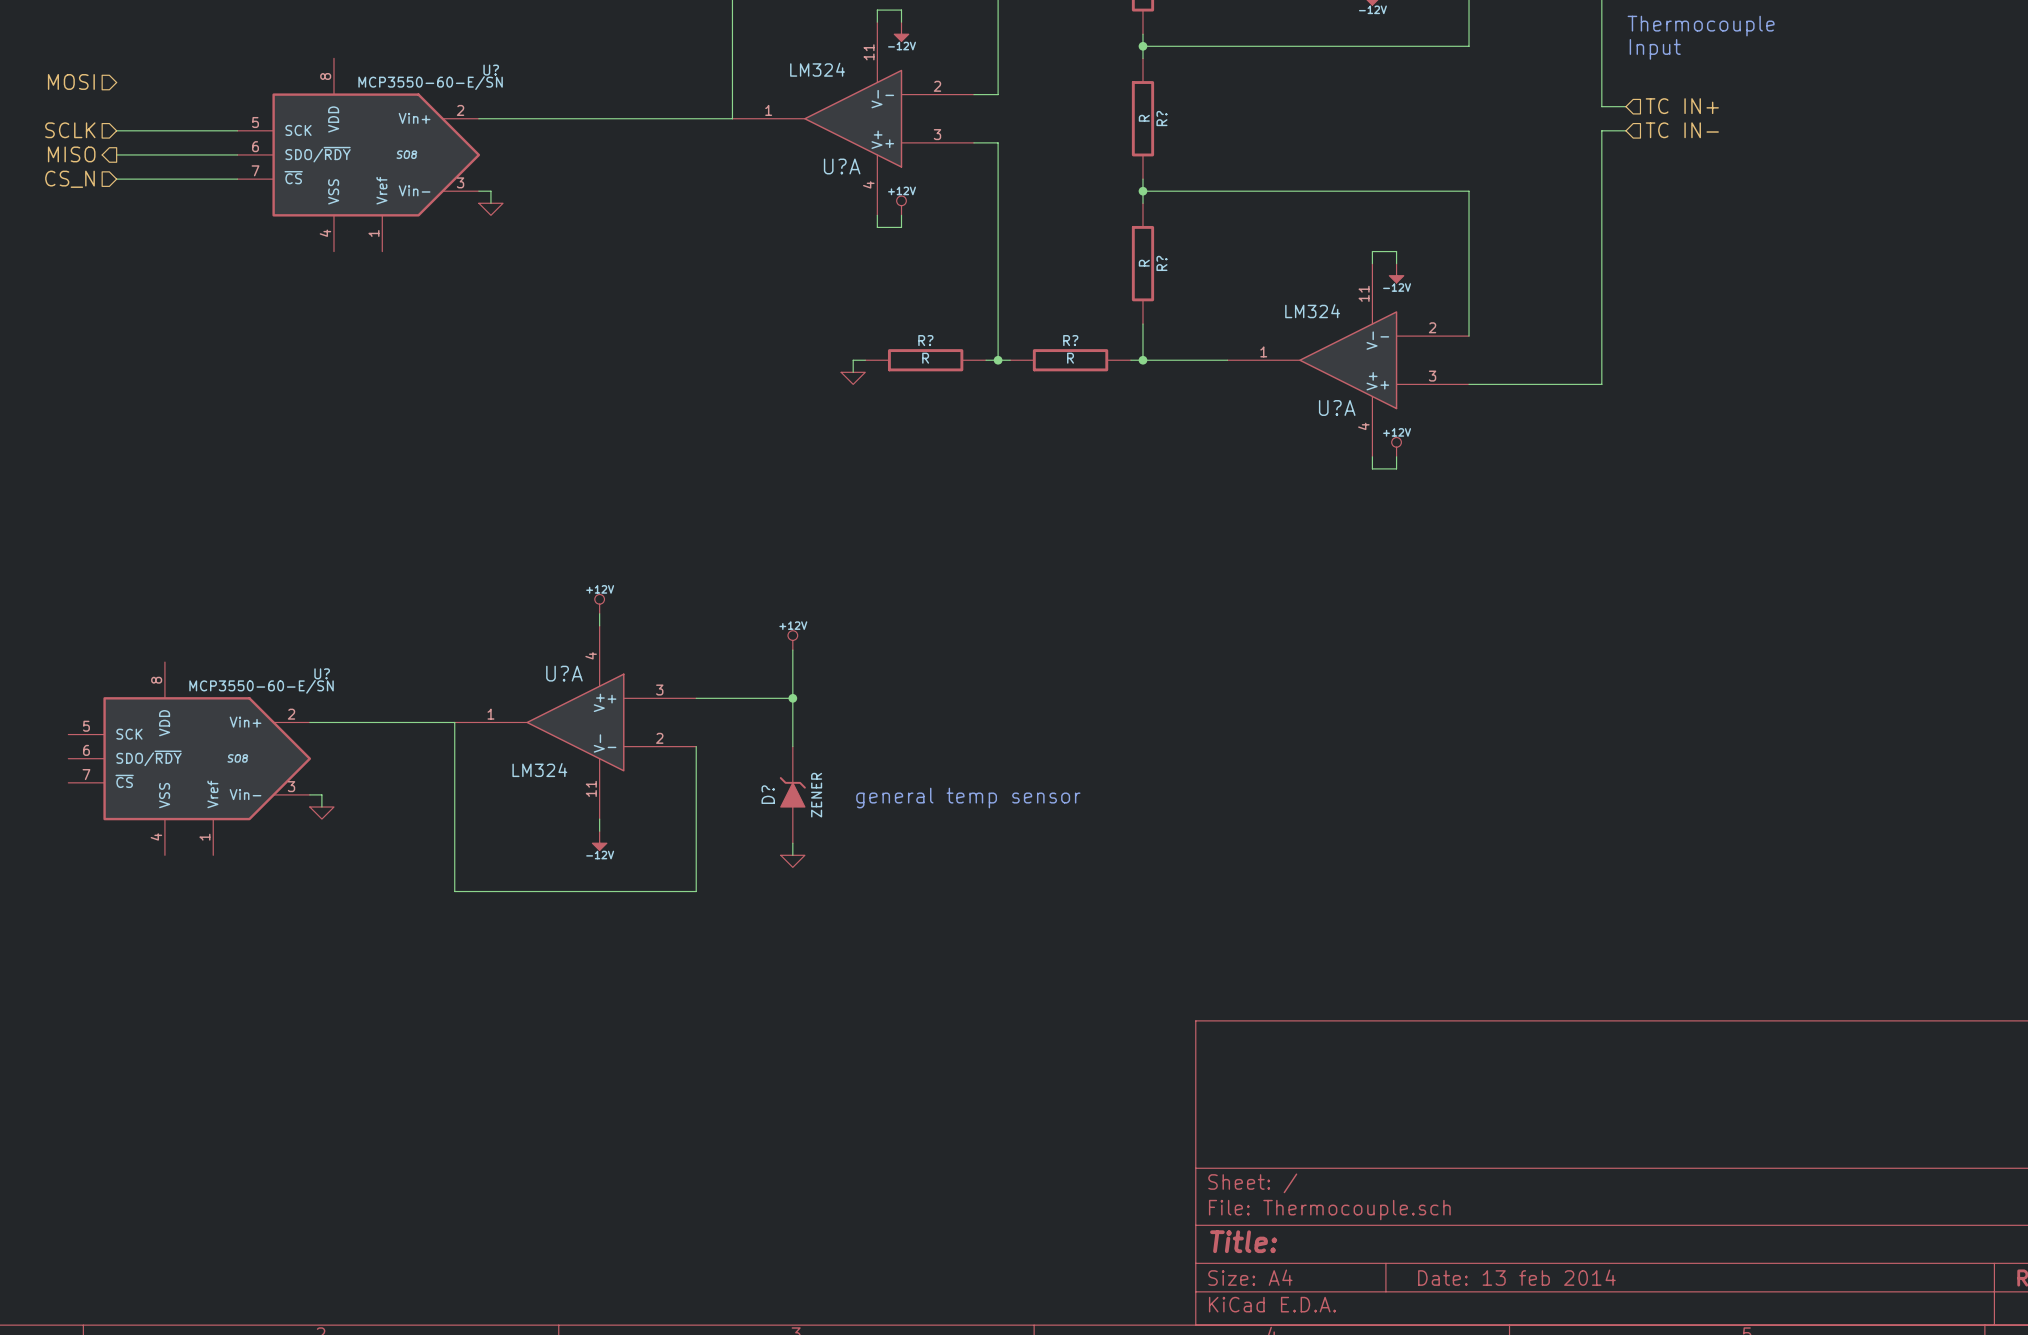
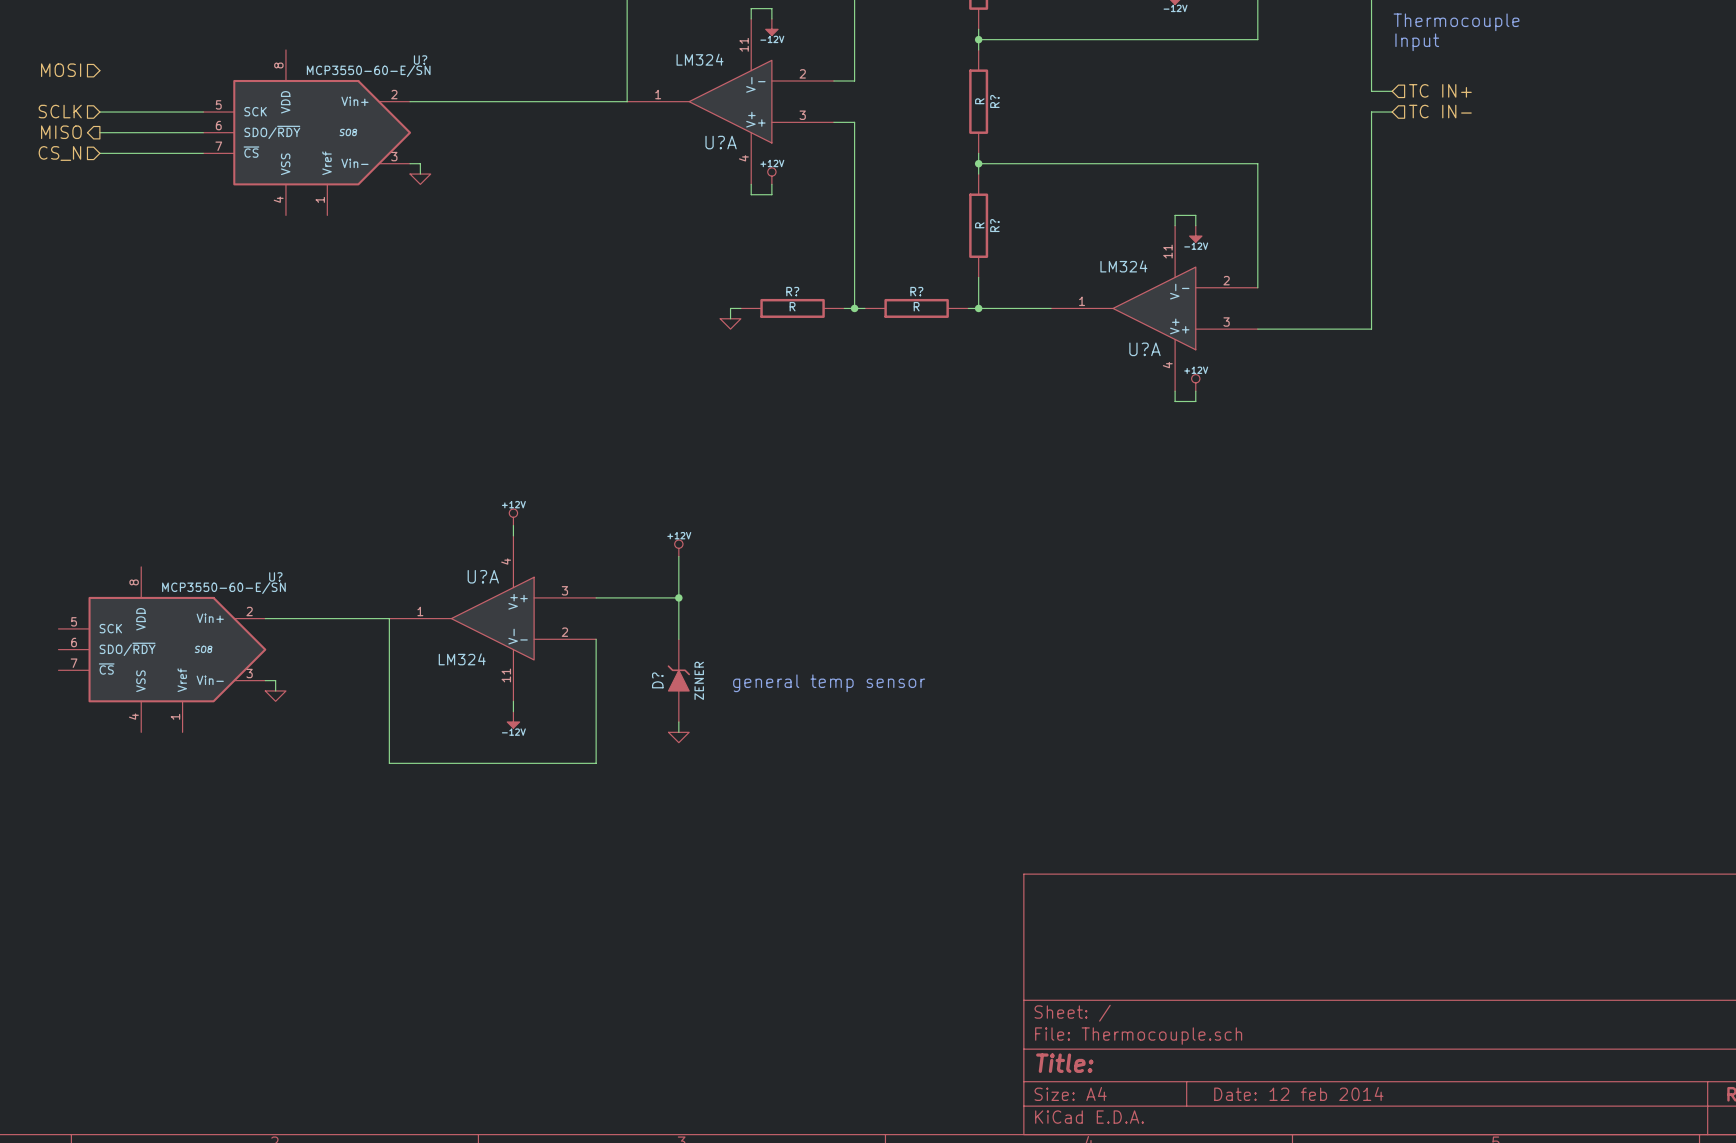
title block: Date: 13 feb 2014 (1516, 1277) -> Date: 12 feb 2014 (1298, 1093)

